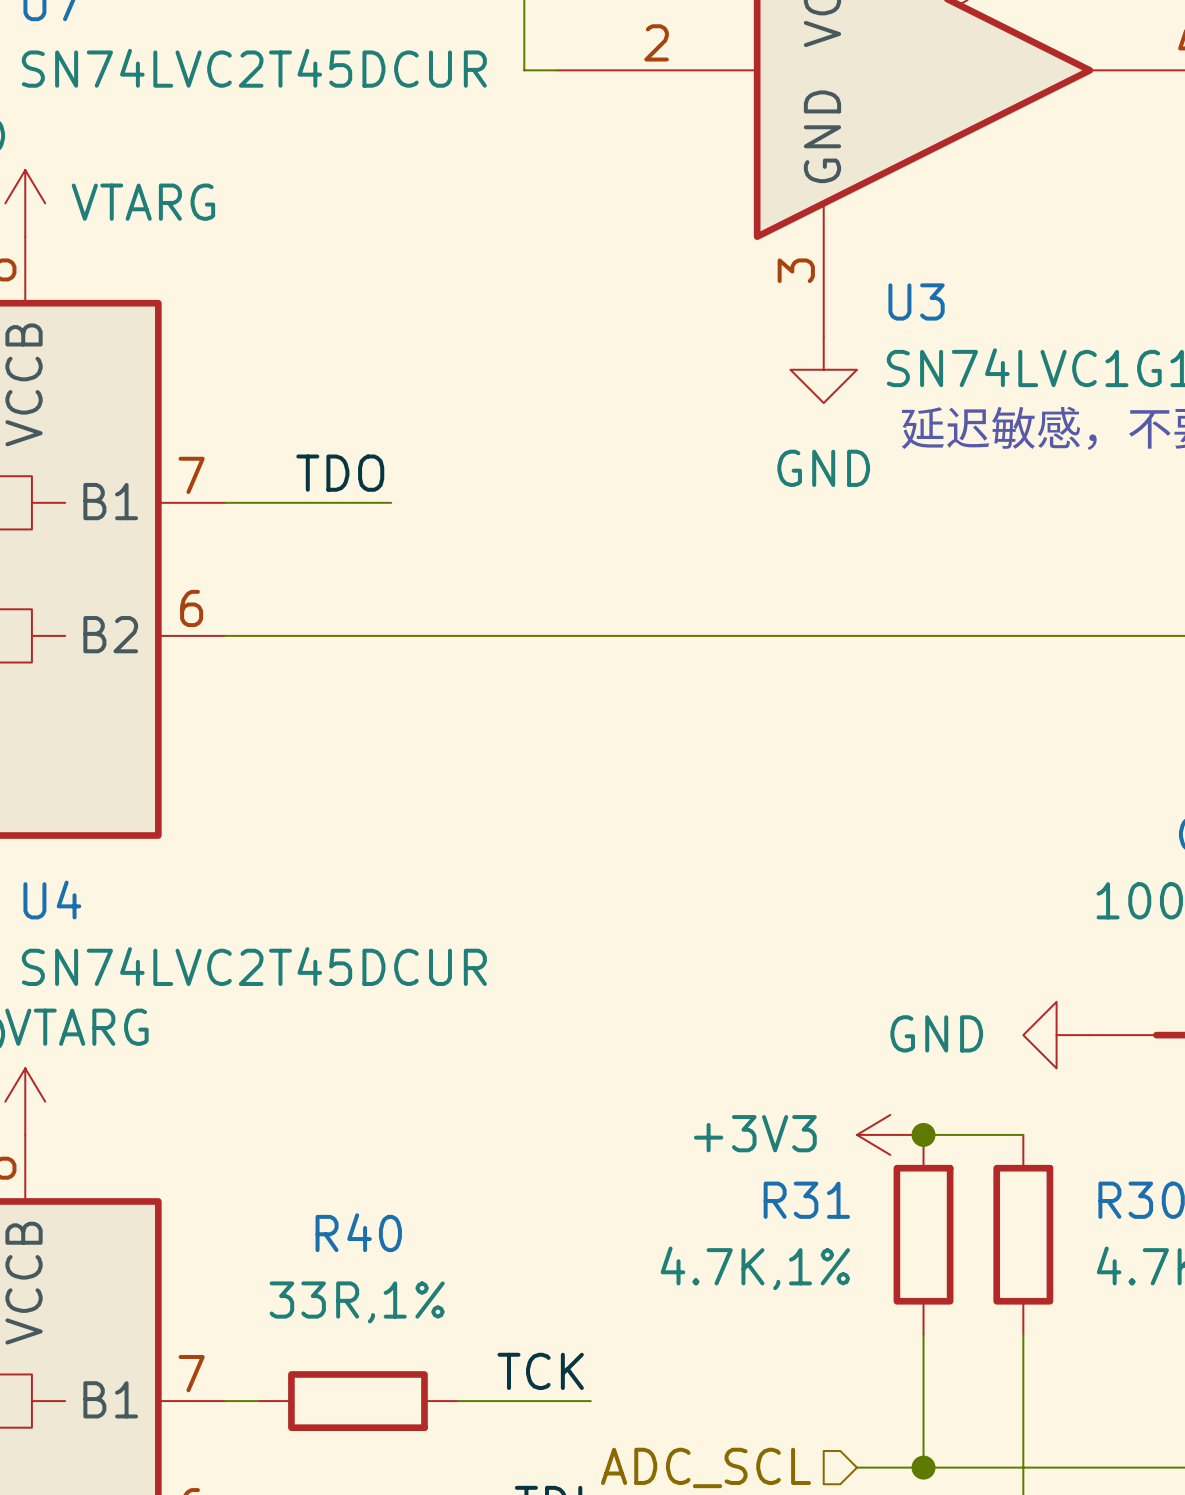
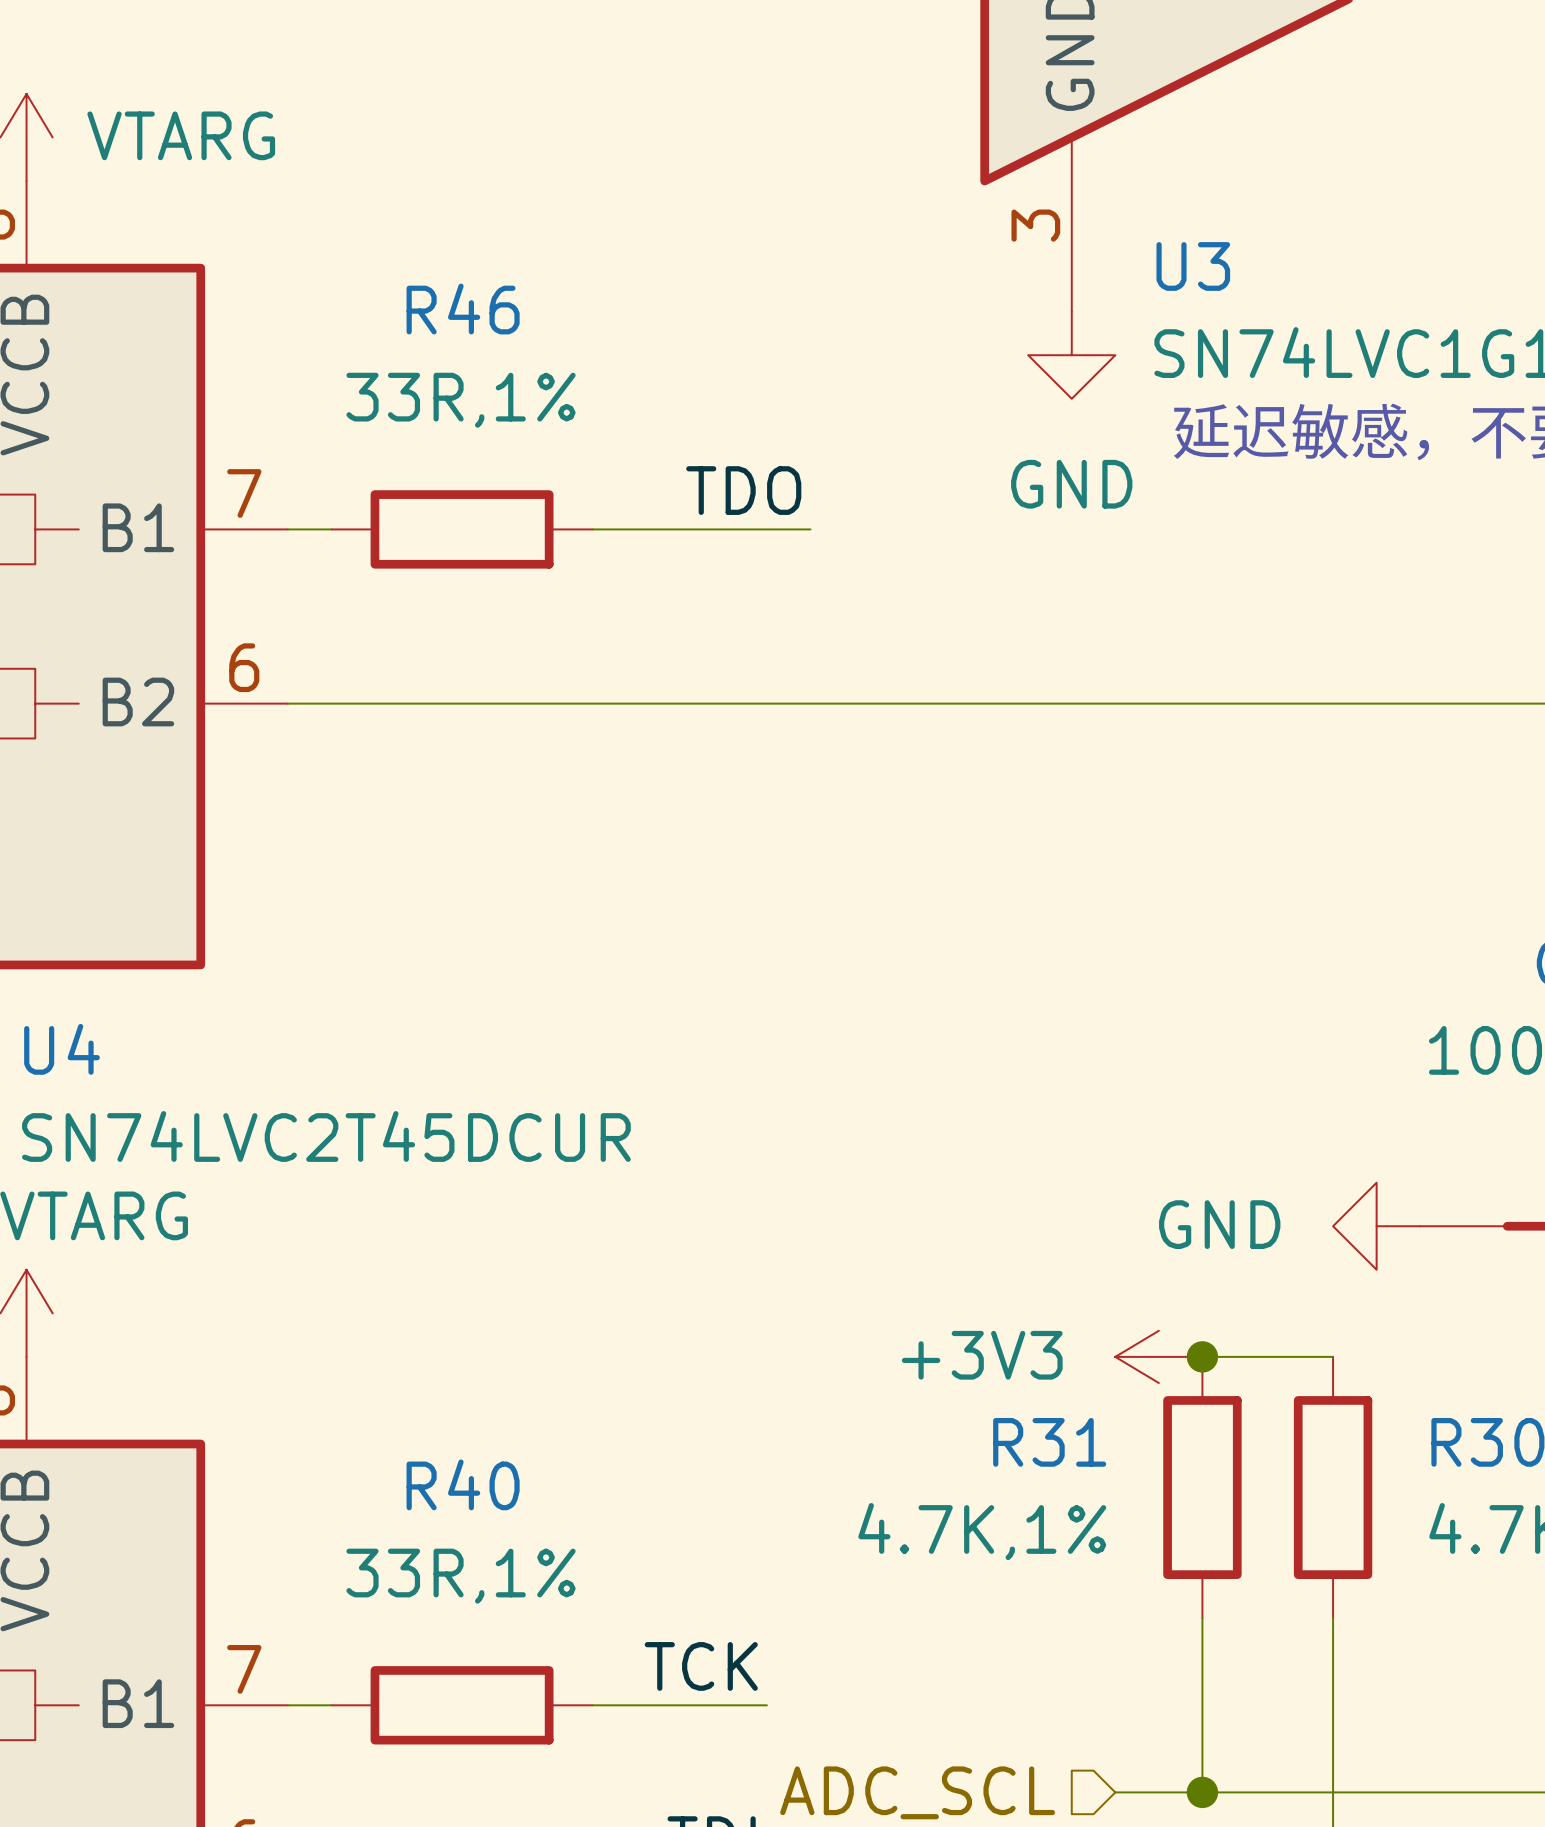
label position: TDO (340, 473) -> TDO (743, 490)
wire: (258, 502) (391, 502) -> none
R46: none -> 33R,1% (462, 529)
wire: none -> (592, 529) (810, 529)

